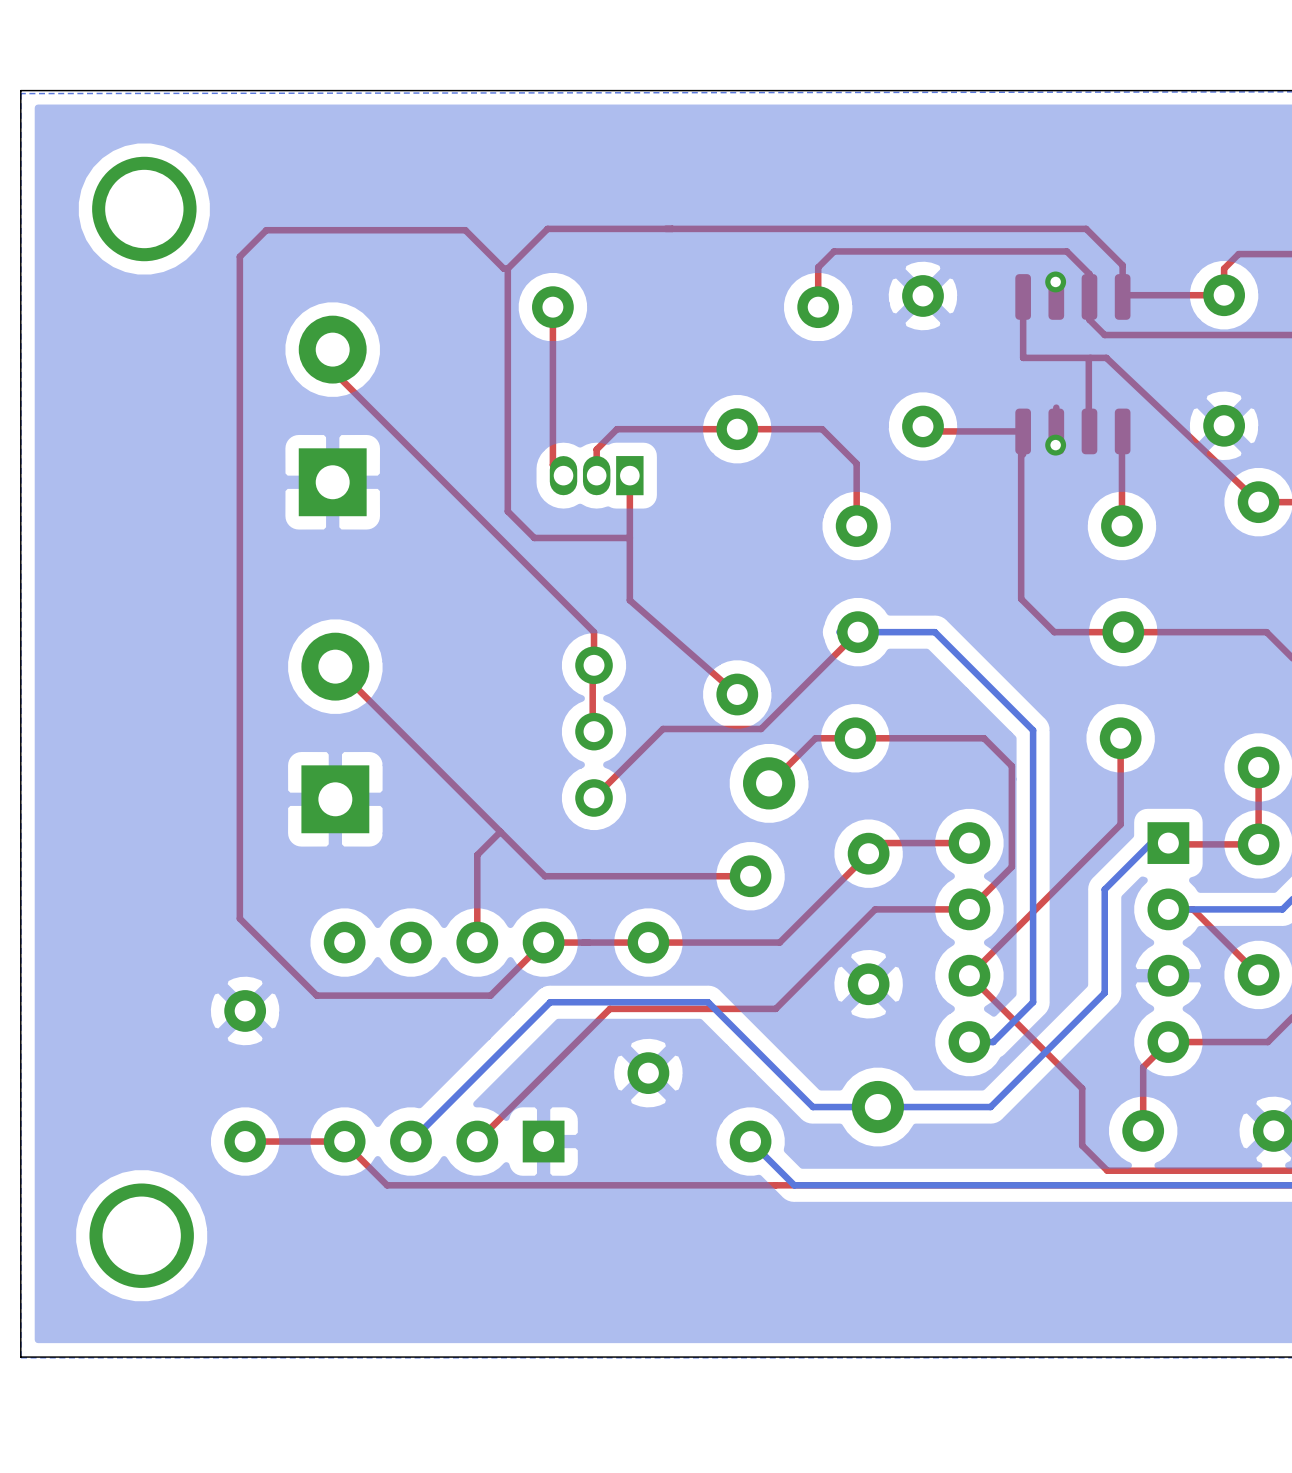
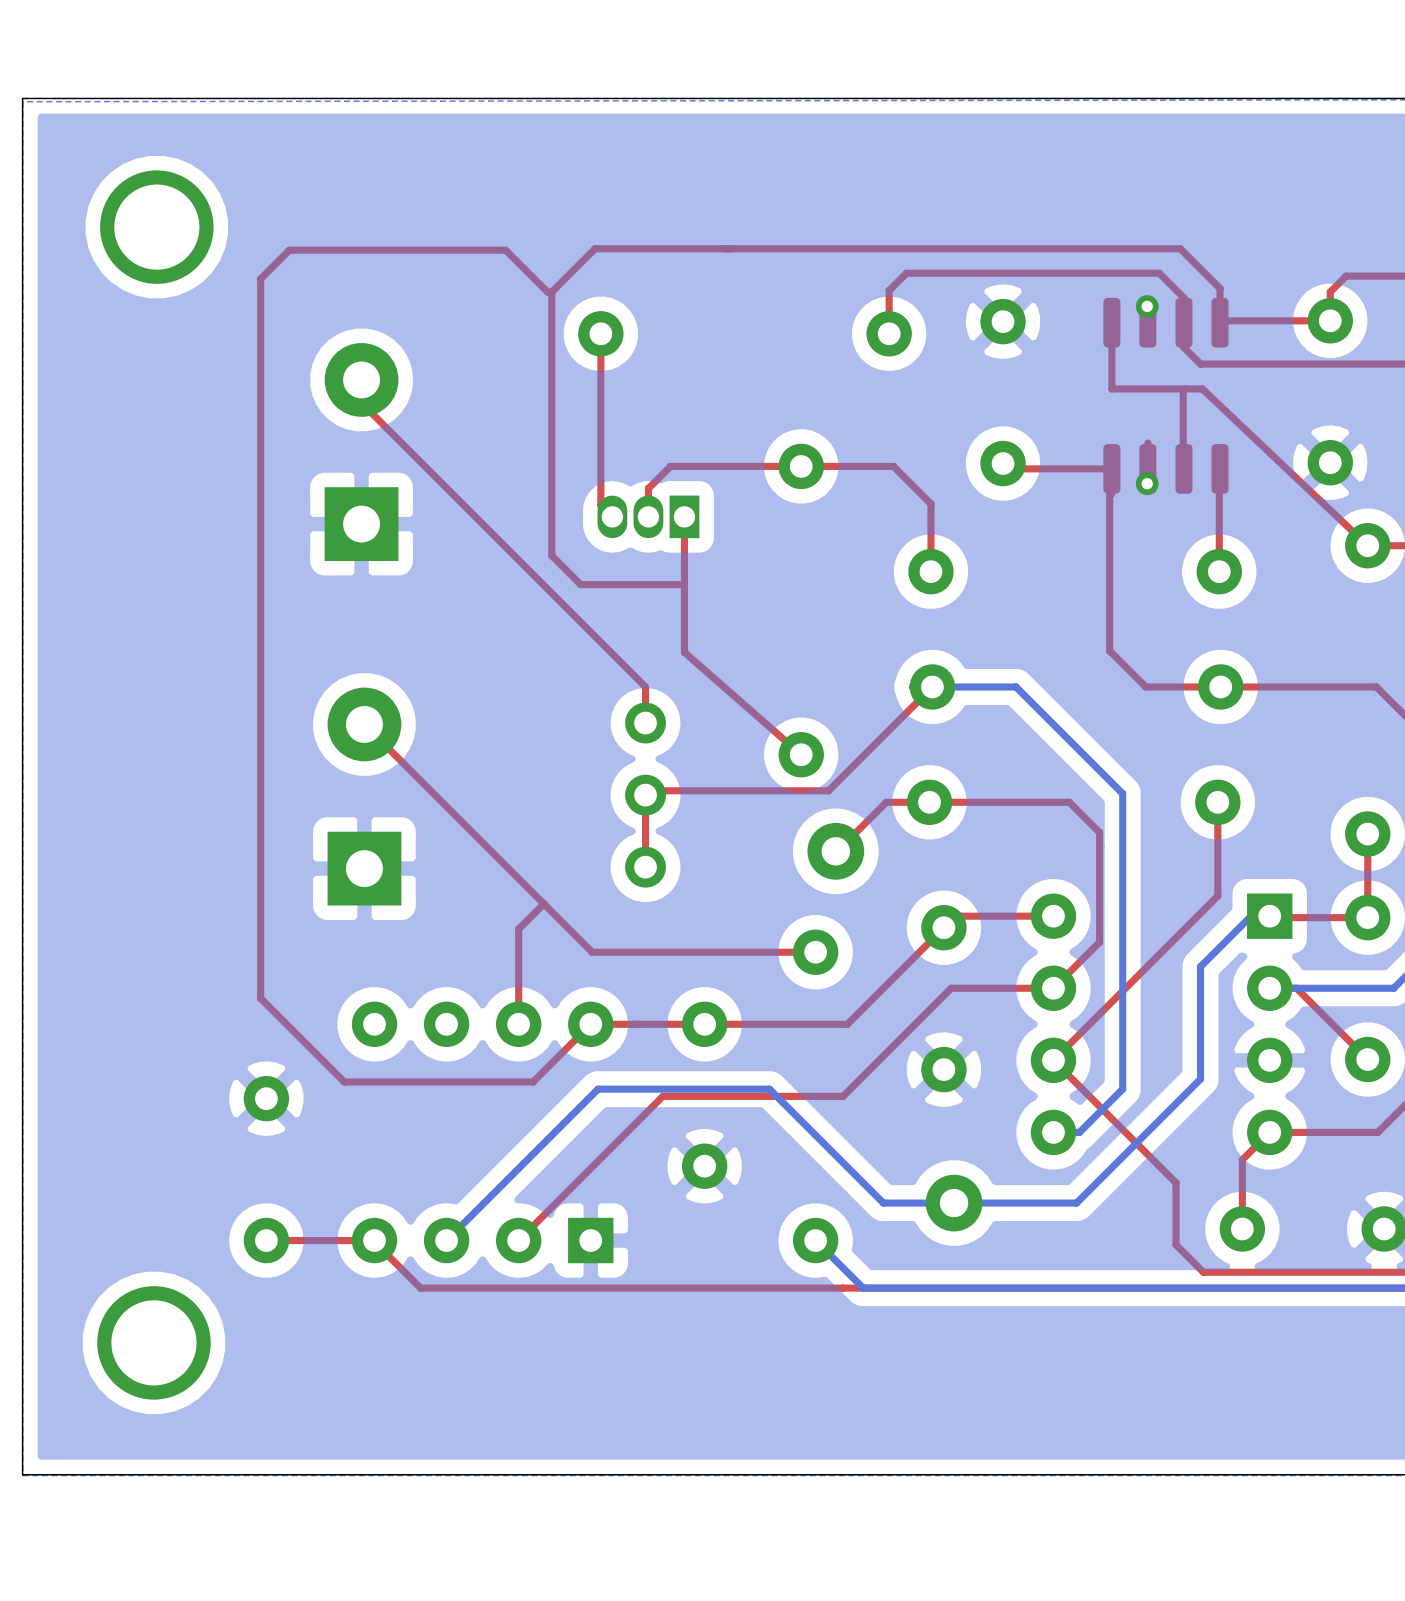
top track: (592, 663) (592, 730) -> (645, 795) (645, 867)
top track: (762, 727) (663, 728) (594, 797) -> (828, 790) (649, 790)

